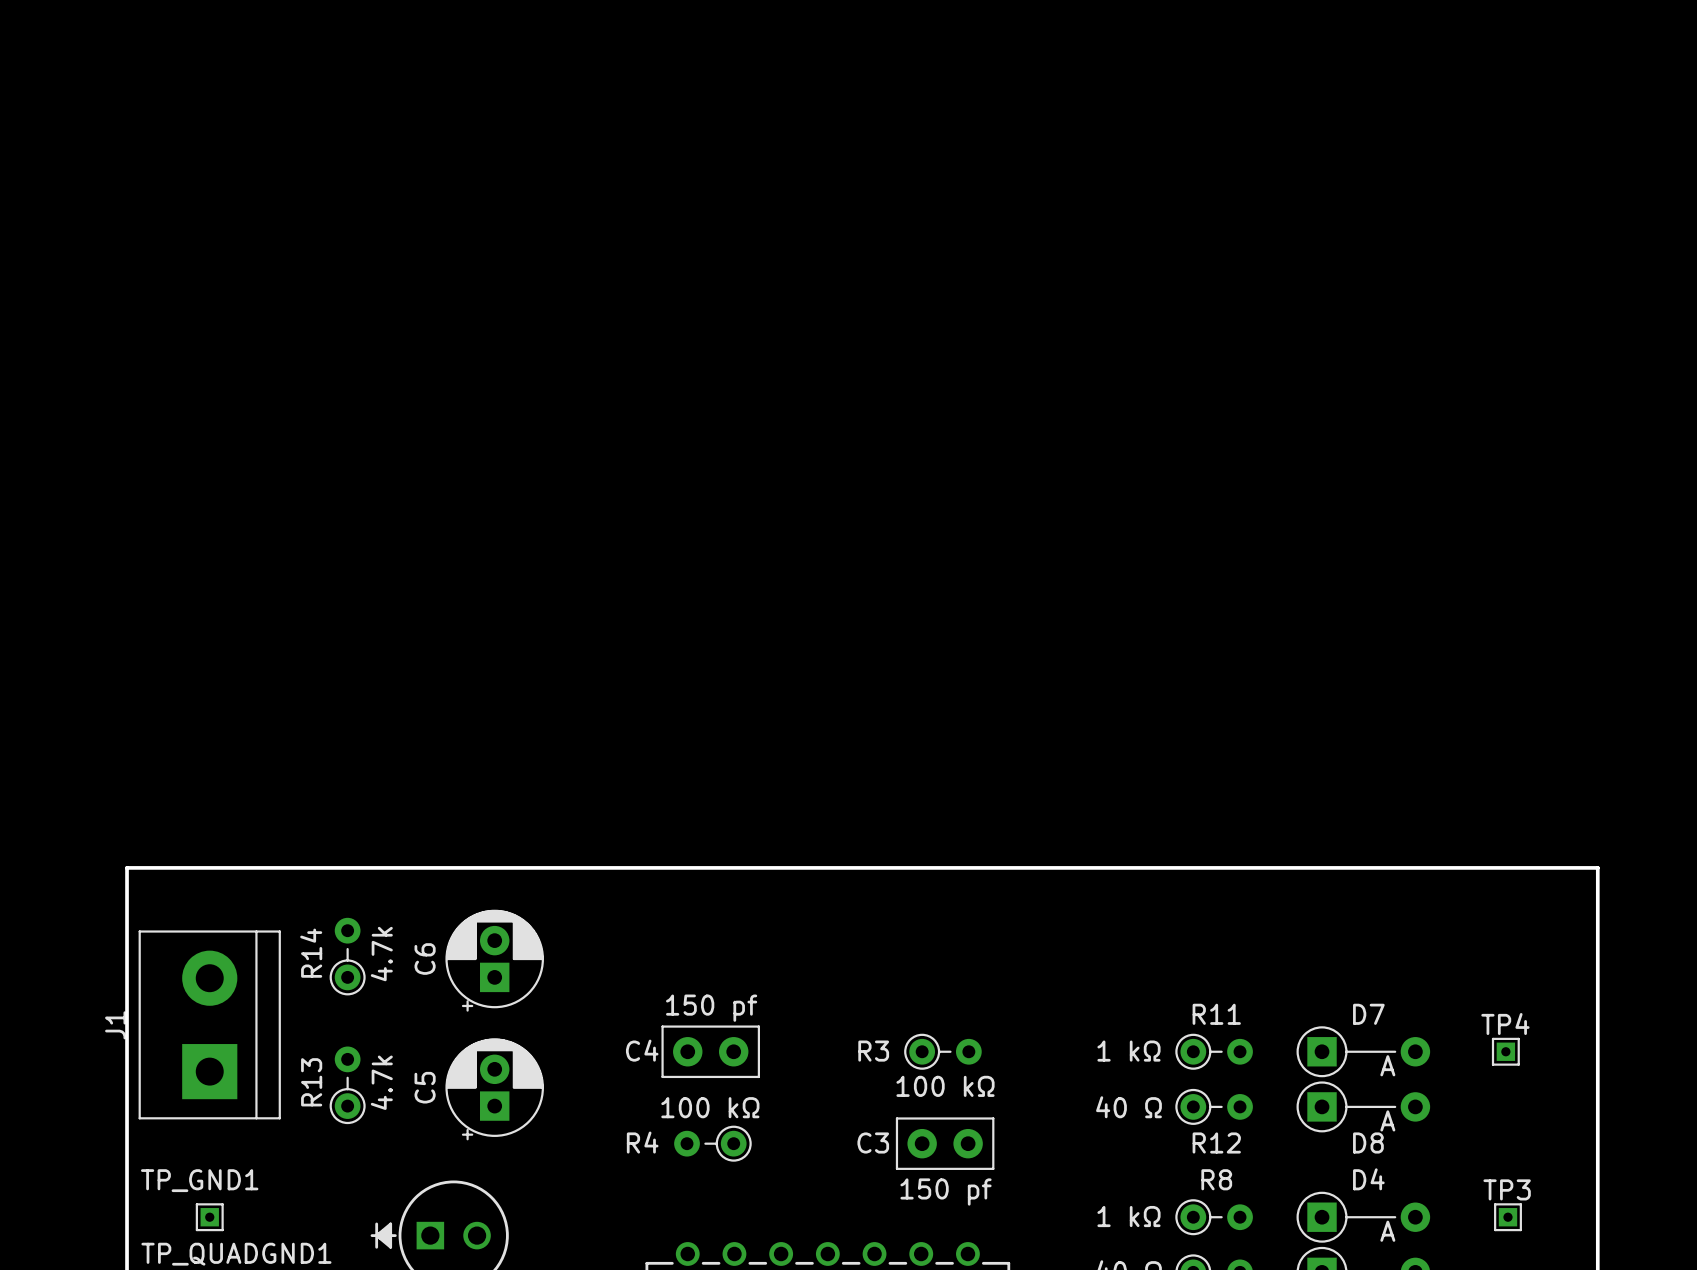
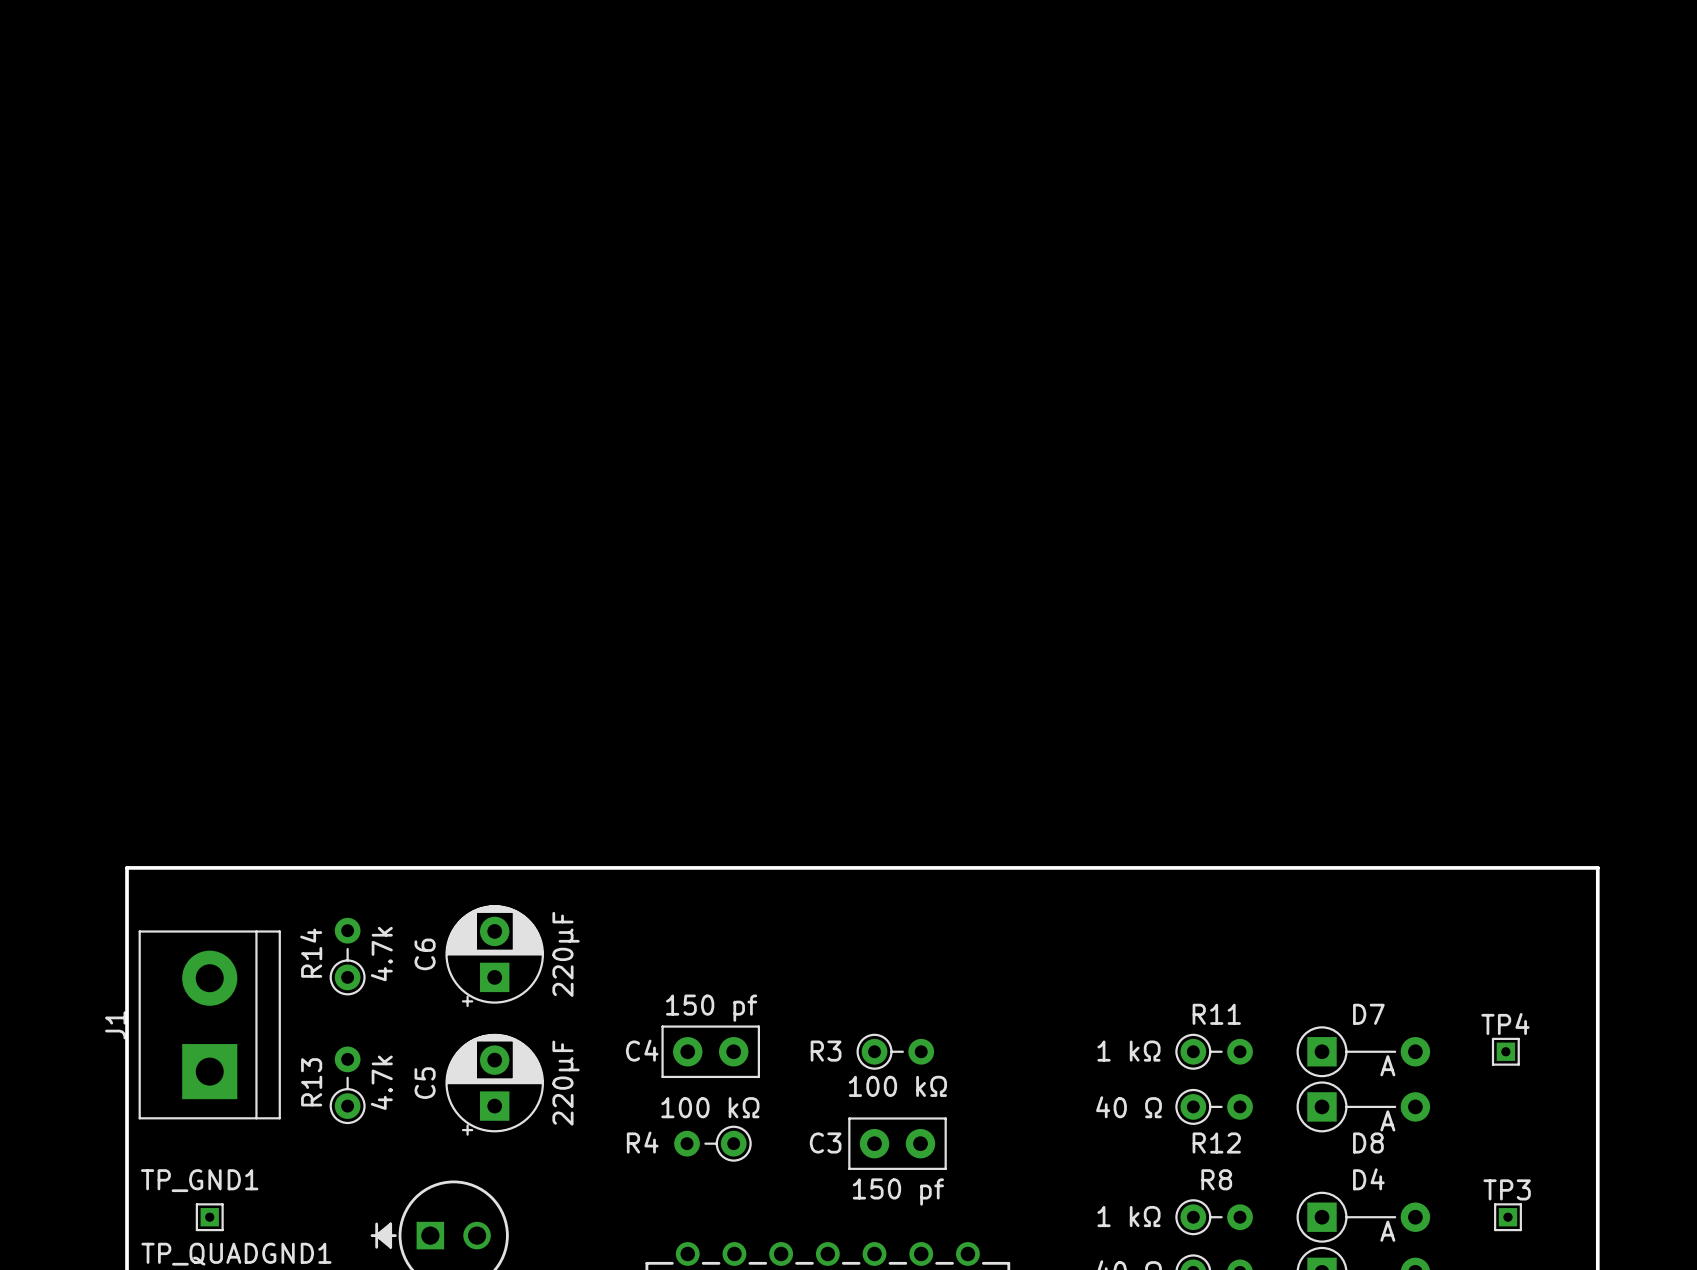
C6 footprint: [445, 909, 544, 1012] -> [445, 905, 544, 1008]
C6 value: none -> 220µF (566, 954)
C5 footprint: [445, 1038, 544, 1141] -> [445, 1033, 544, 1136]
R3 position: (942, 1051) -> (895, 1051)
C5 value: none -> 220µF (566, 1083)
C3 position: (945, 1143) -> (897, 1143)

